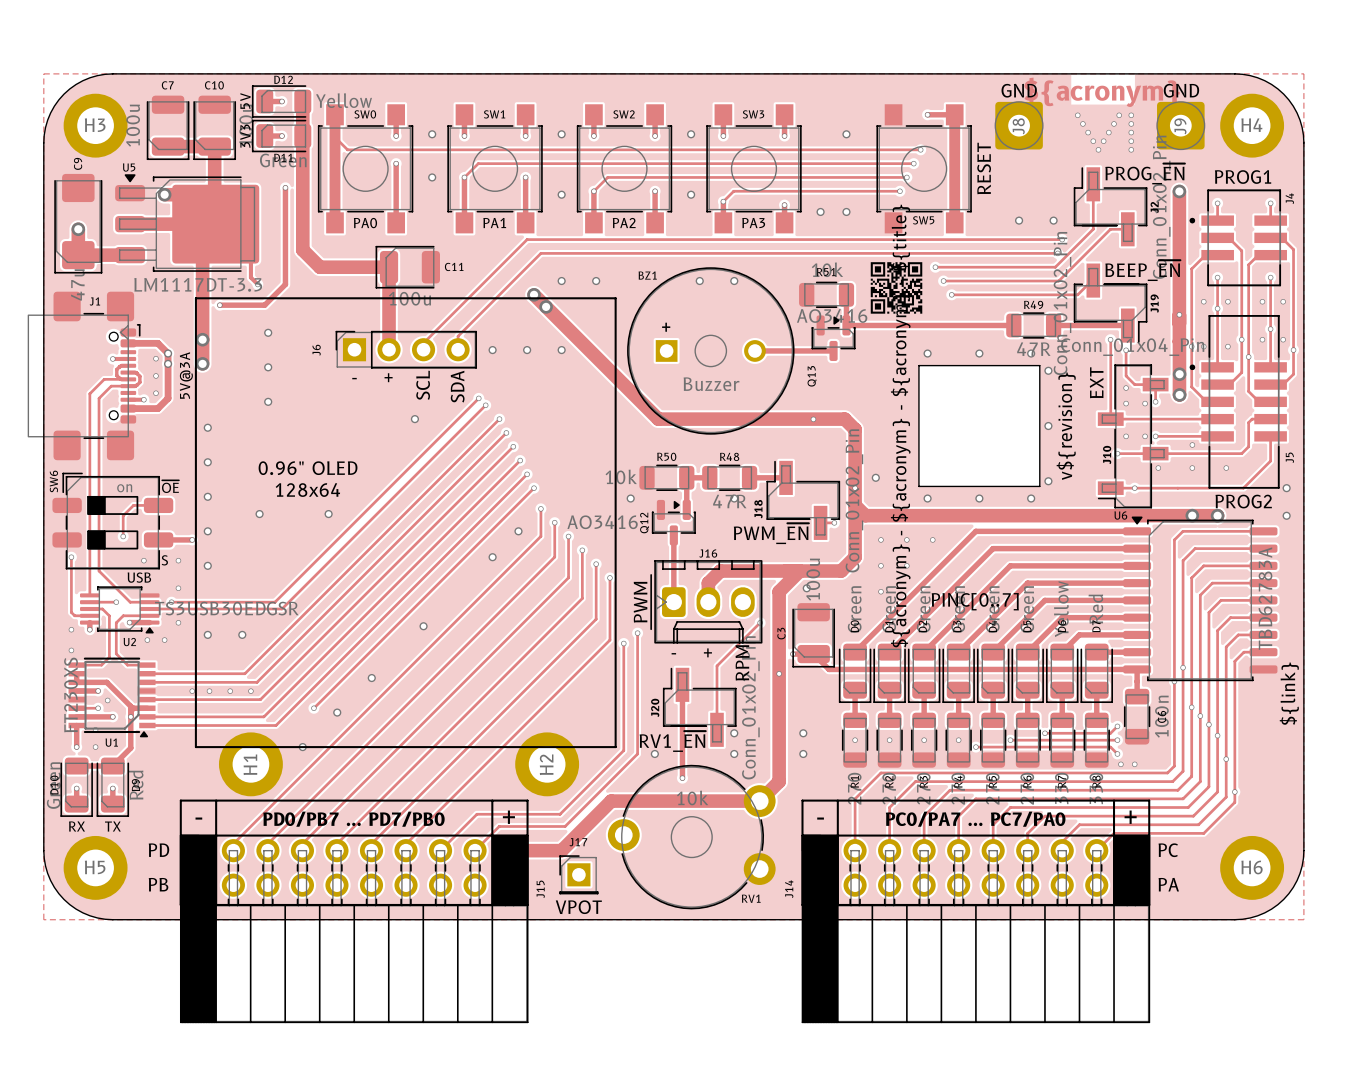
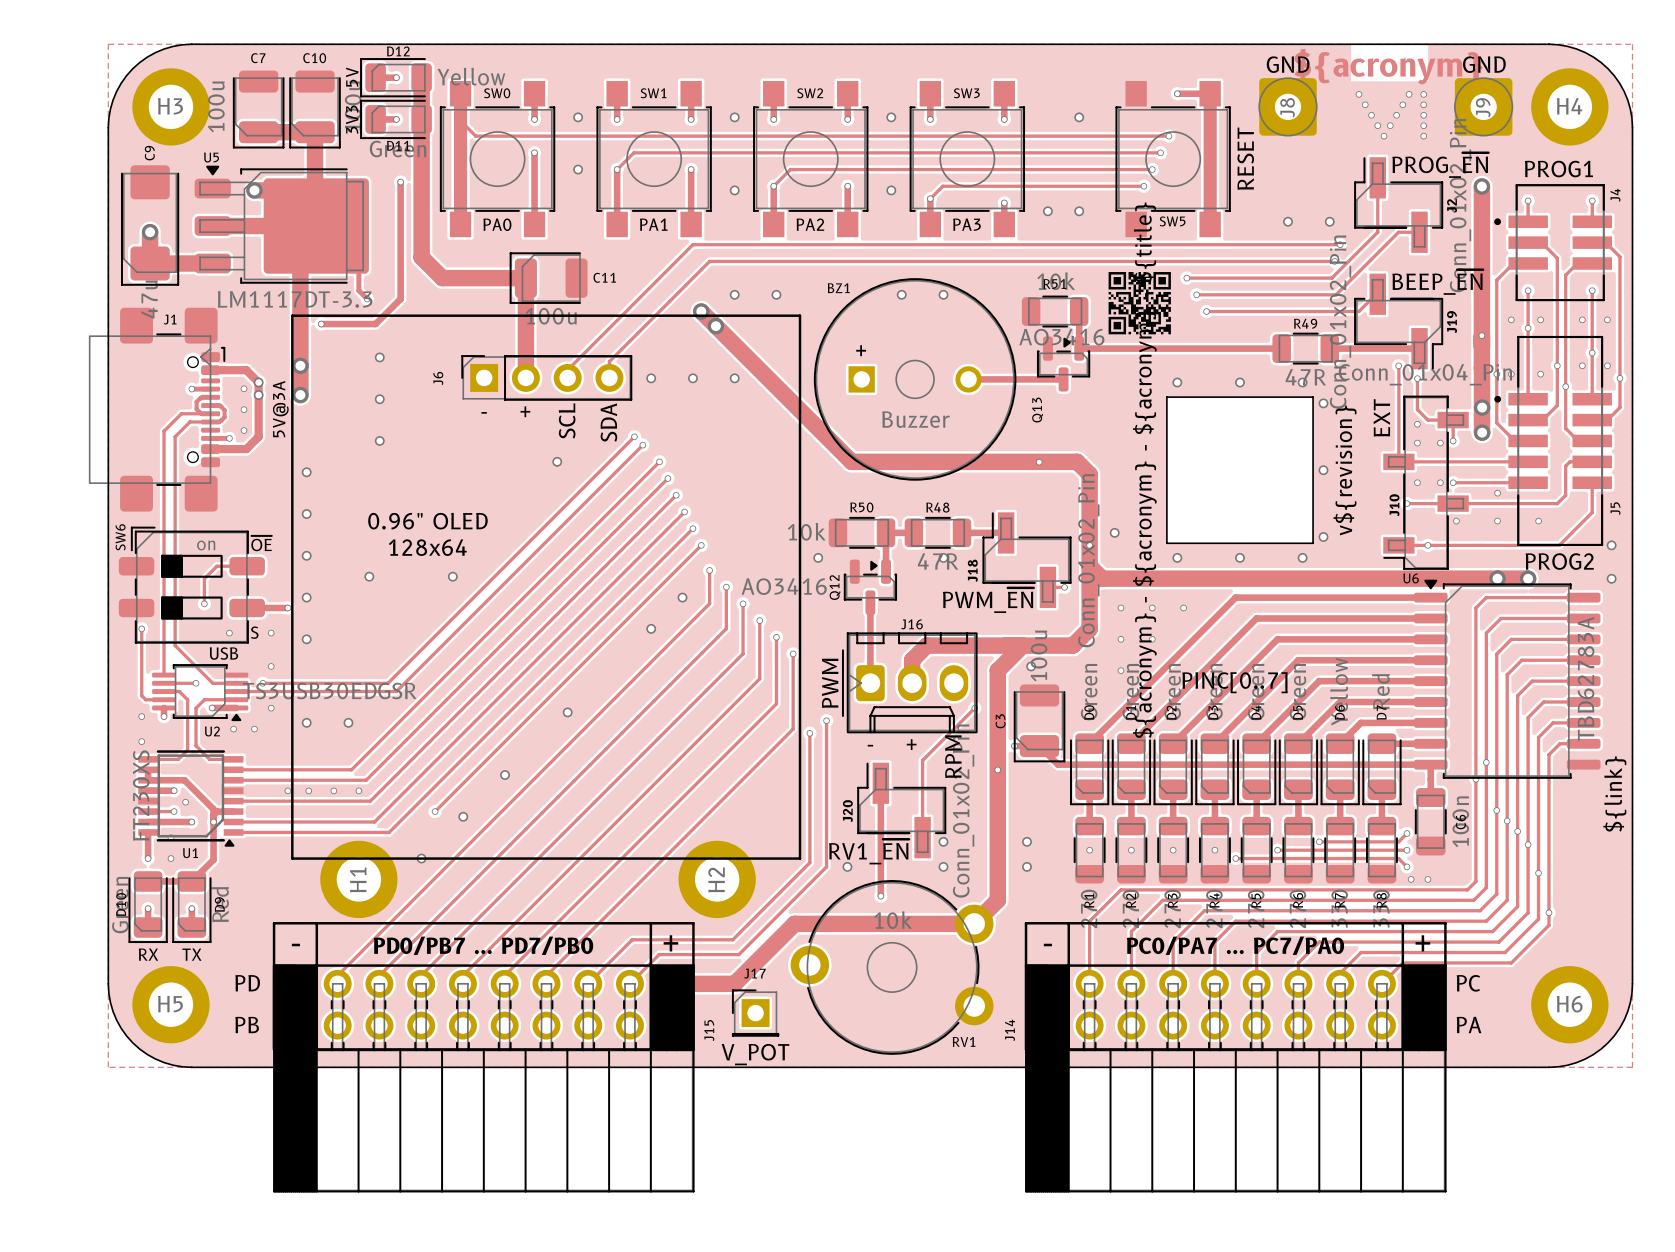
text: VPOT (578, 907) -> V_POT (755, 1054)

